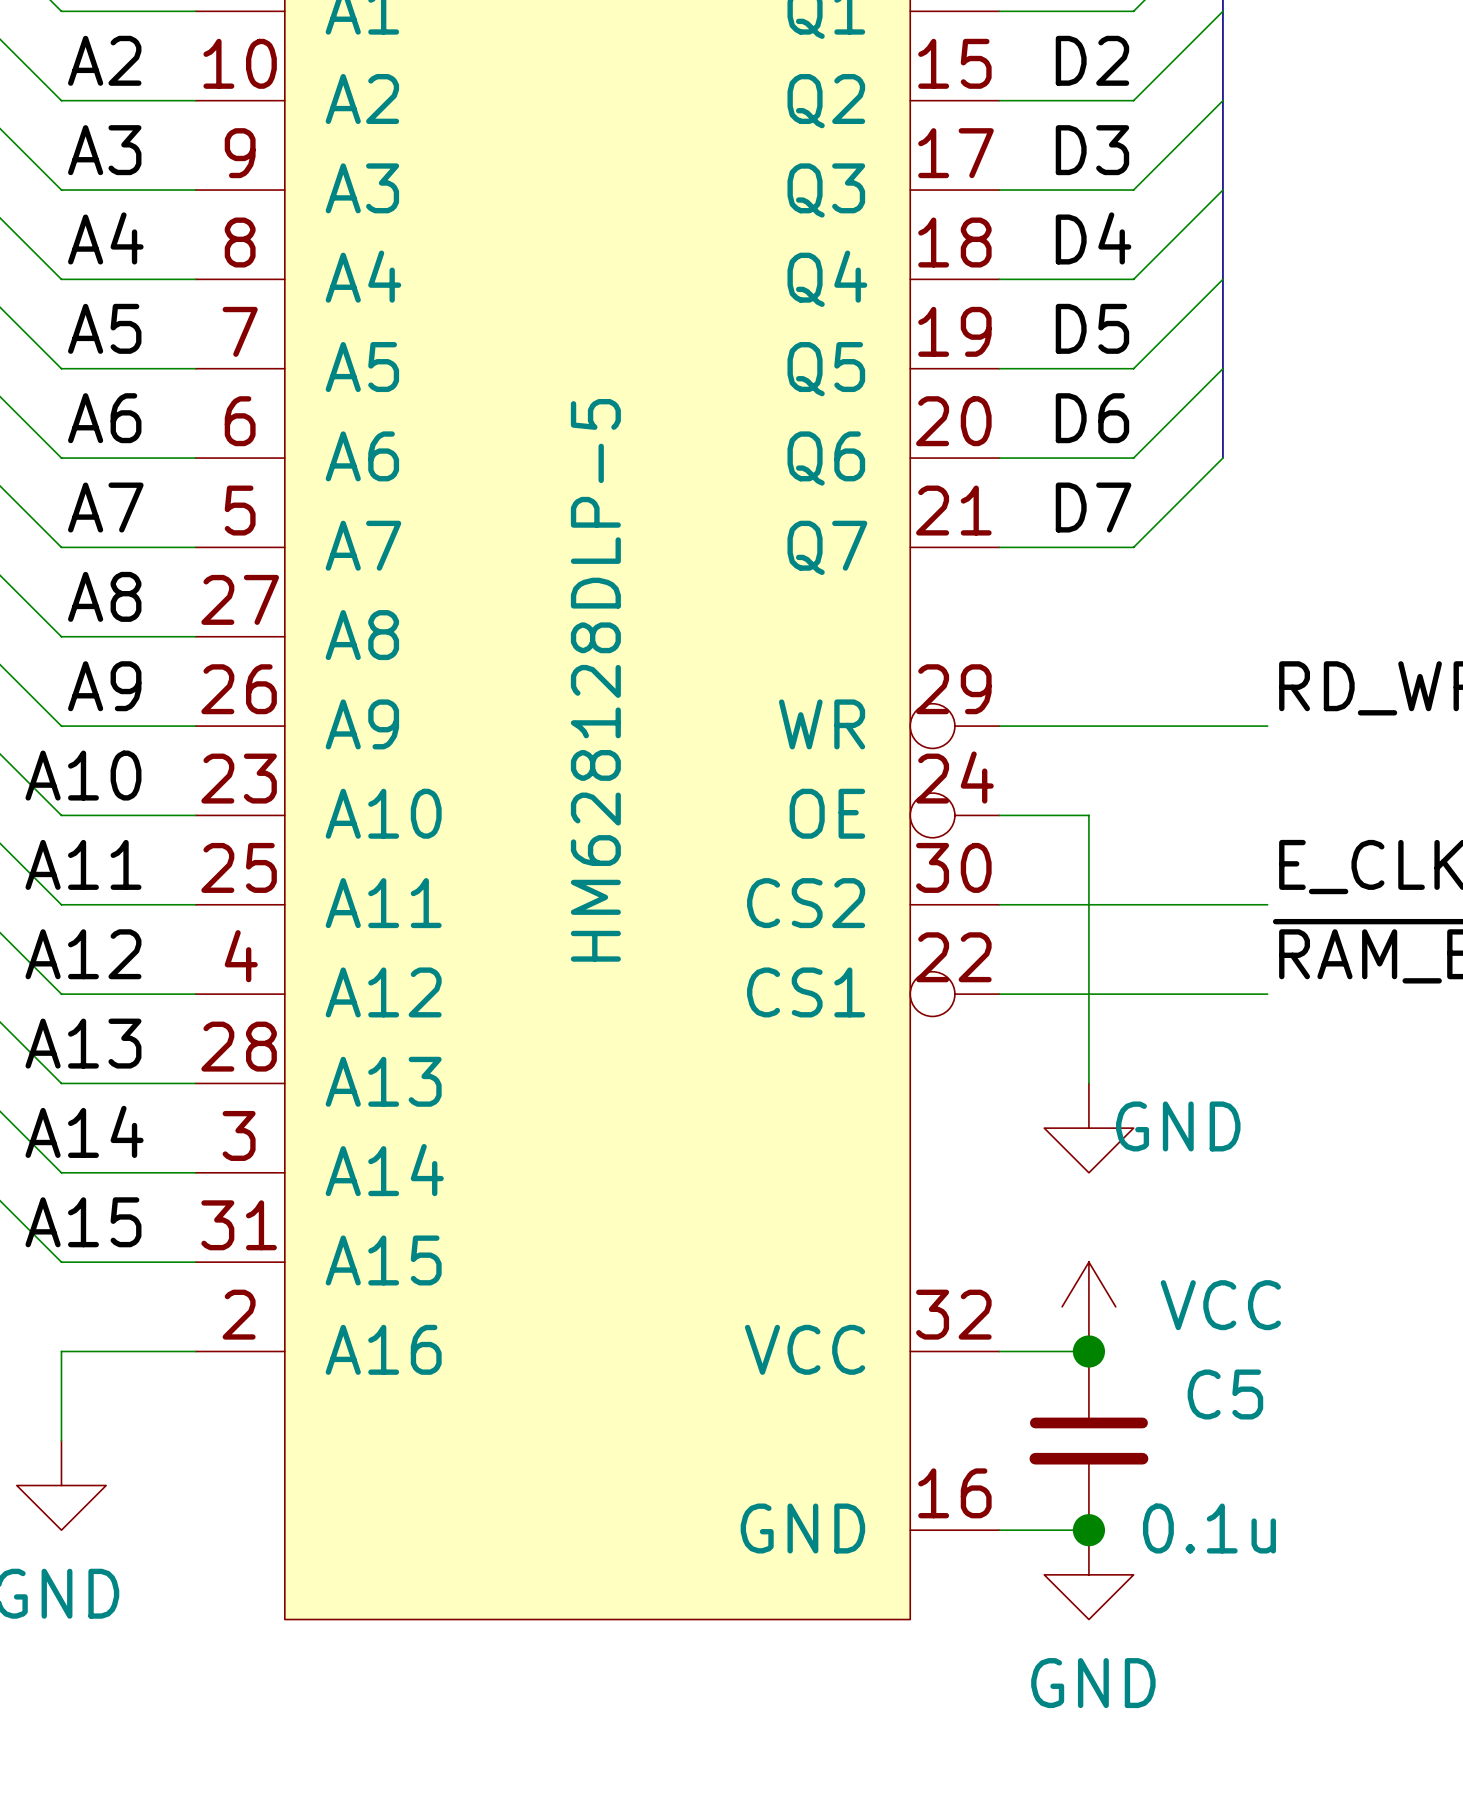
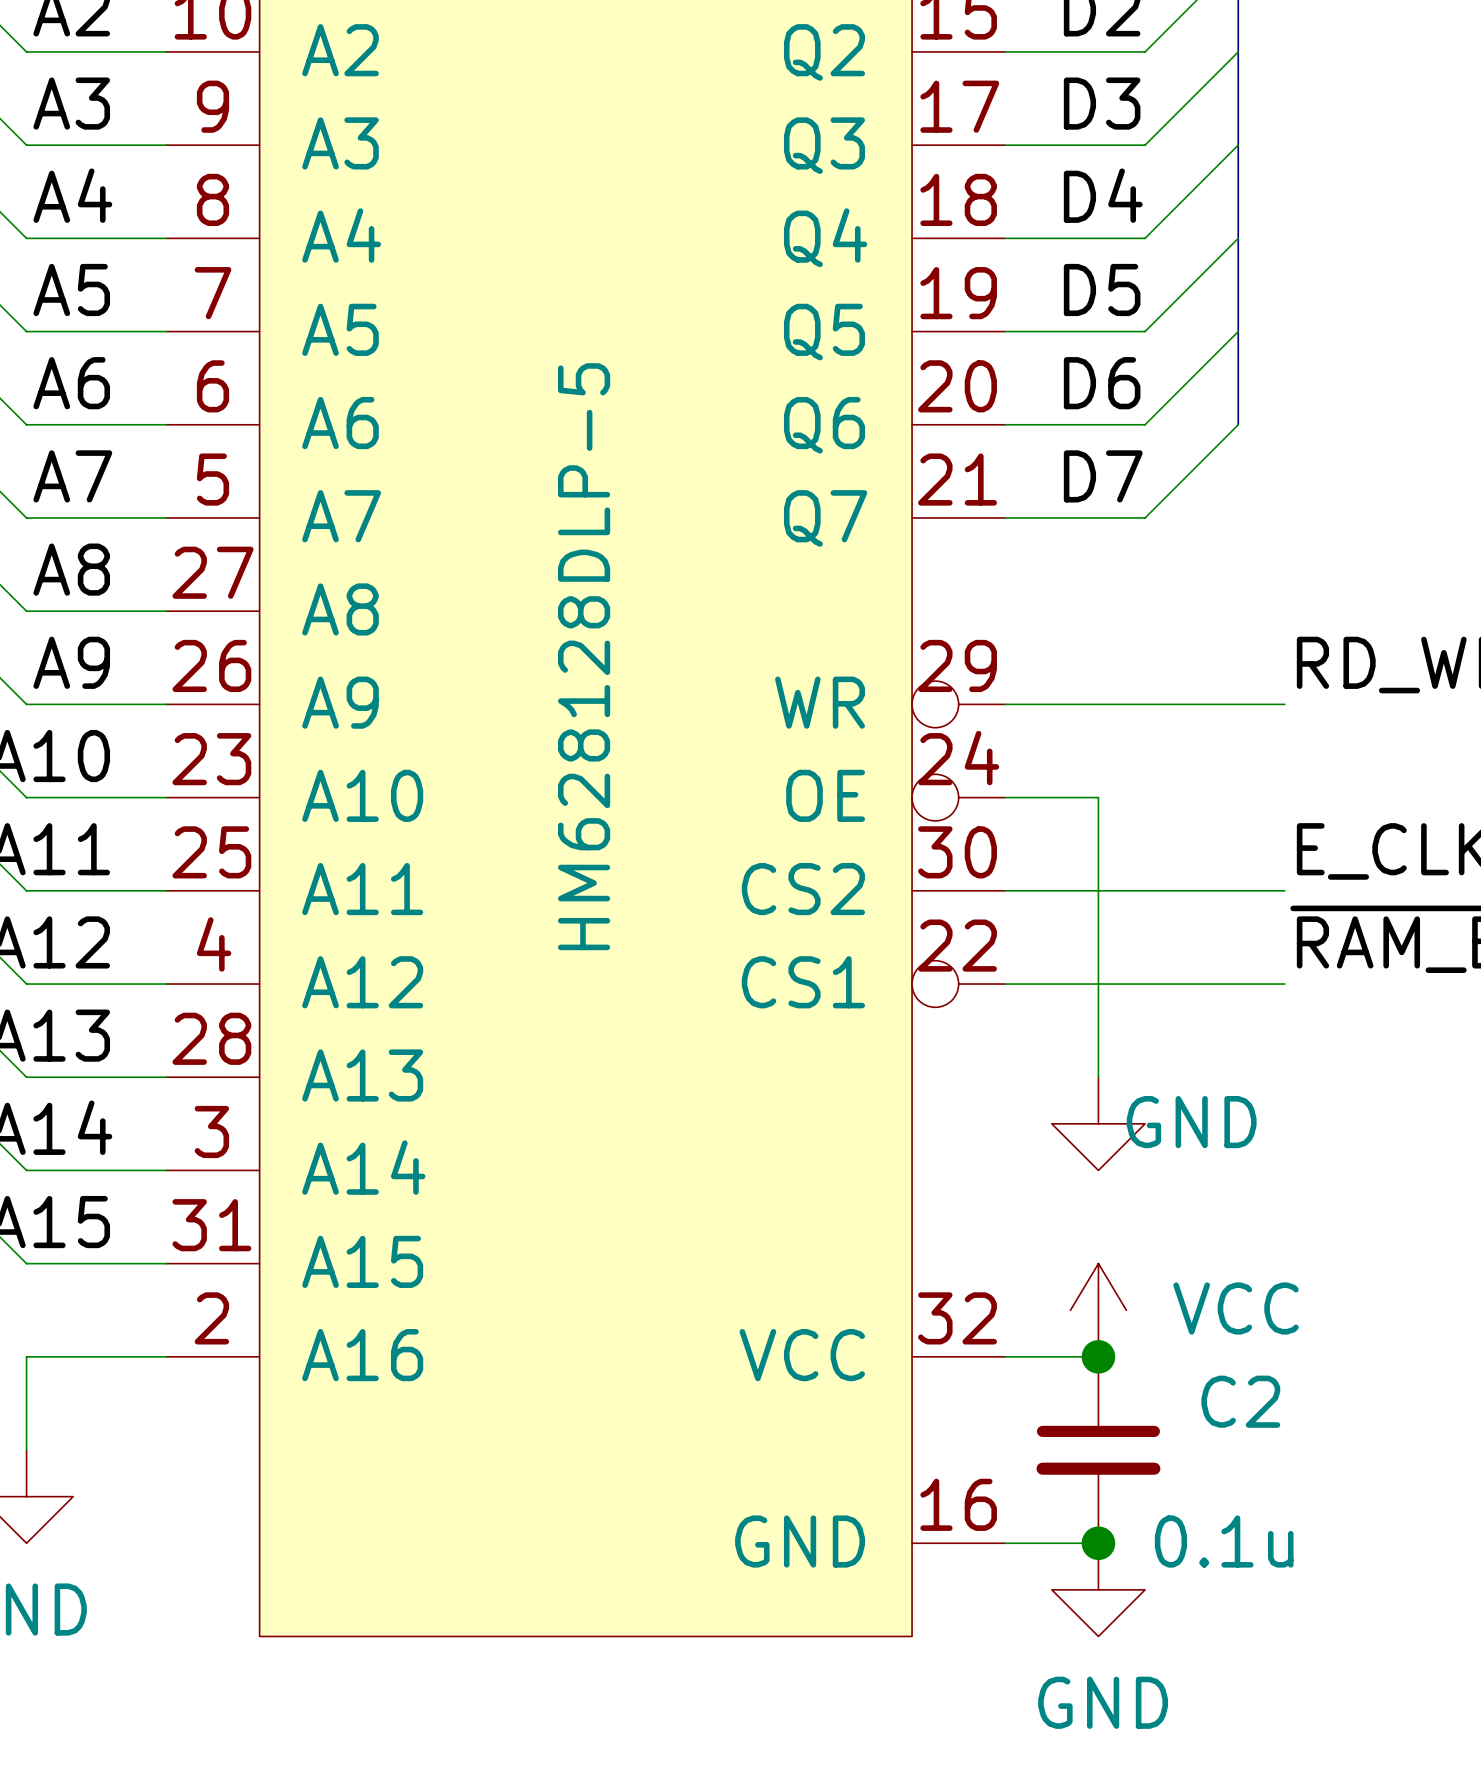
C5 name: C5 (1225, 1394) -> C2 (1240, 1401)

